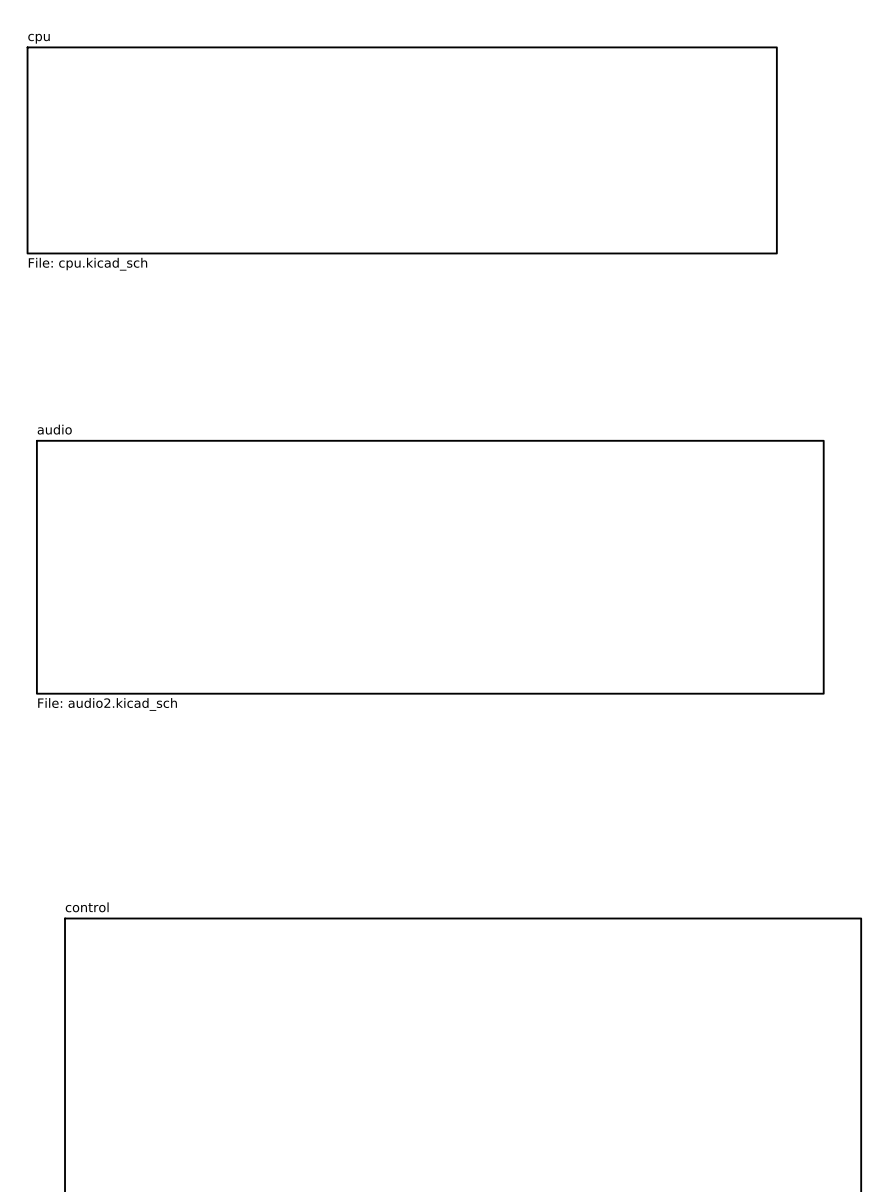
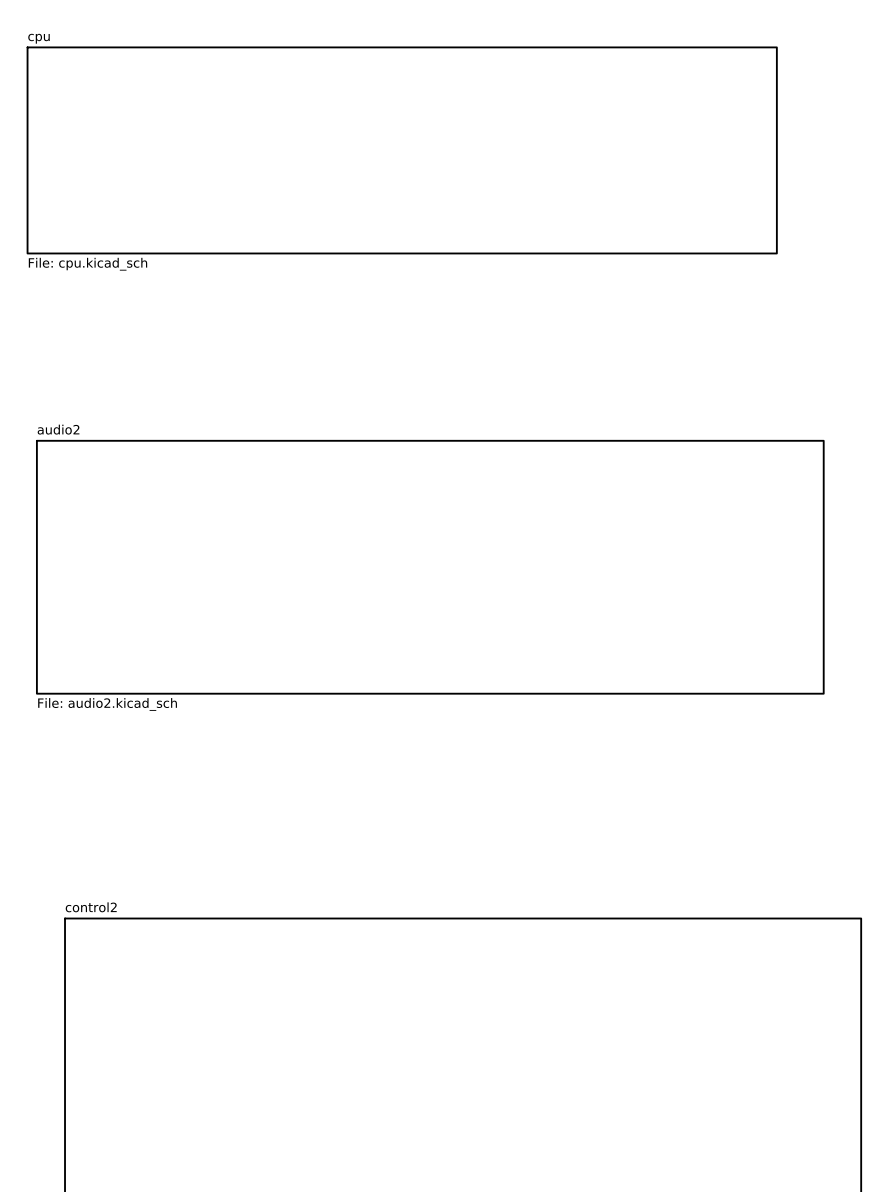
sheet audio name: audio (54, 429) -> audio2 (58, 429)
sheet control name: control (87, 907) -> control2 (91, 907)

